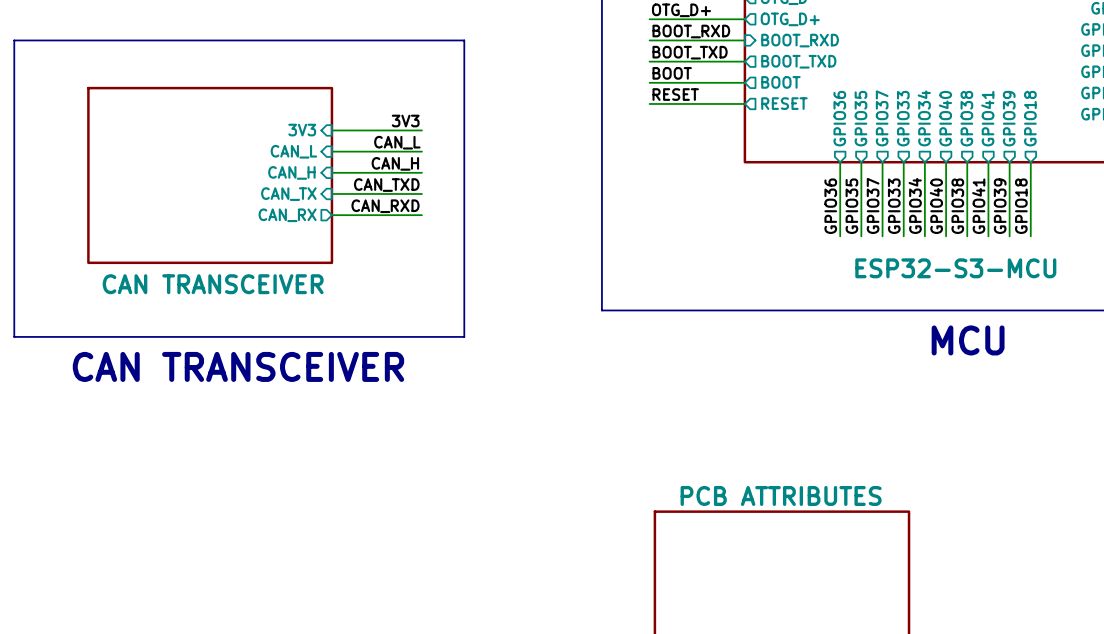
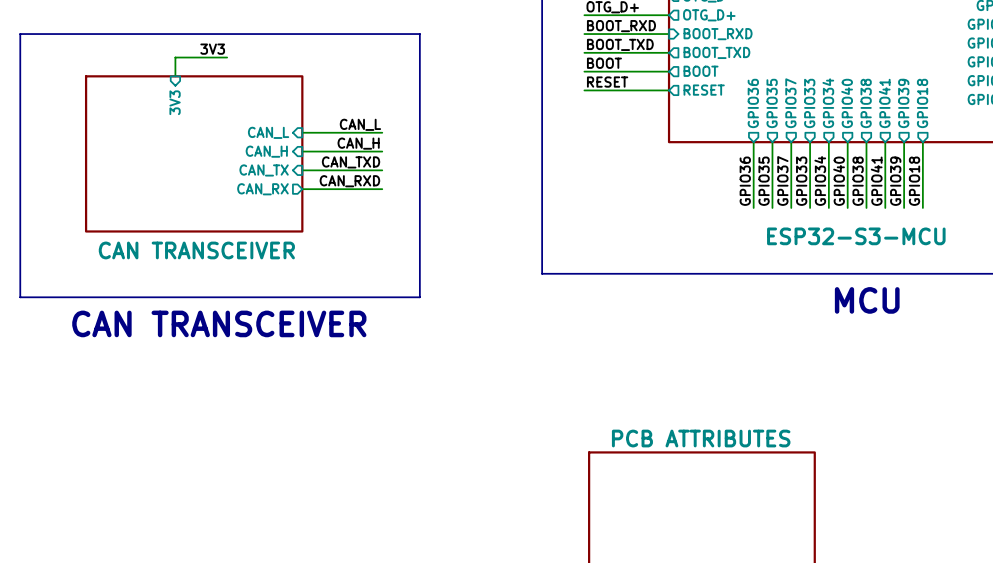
wire: none -> (227, 57) (175, 57) (175, 76)
label position: 3V3 (405, 121) -> 3V3 (212, 49)
sheet pin rotation: 0° (302, 130) -> 90° counterclockwise (175, 102)
sheet pin position: 3V3 (302, 130) -> 3V3 (175, 102)
wire: (331, 130) (421, 130) -> none

